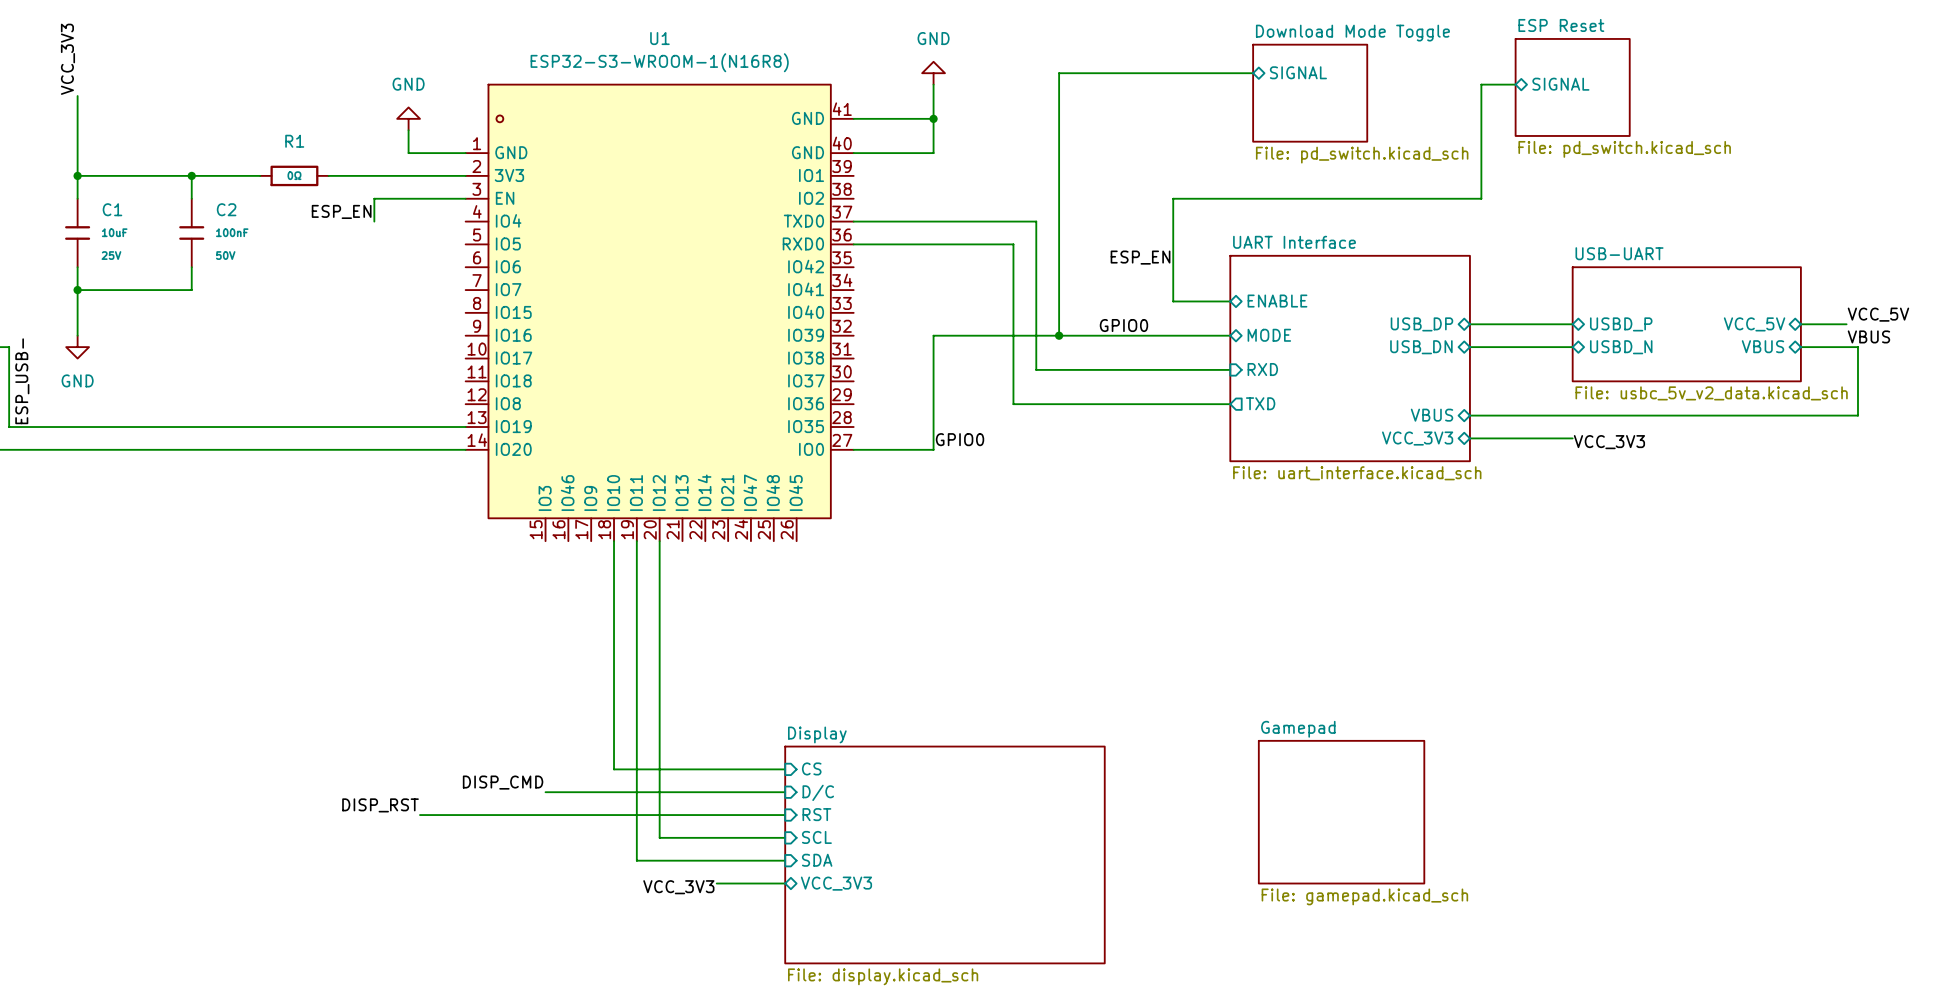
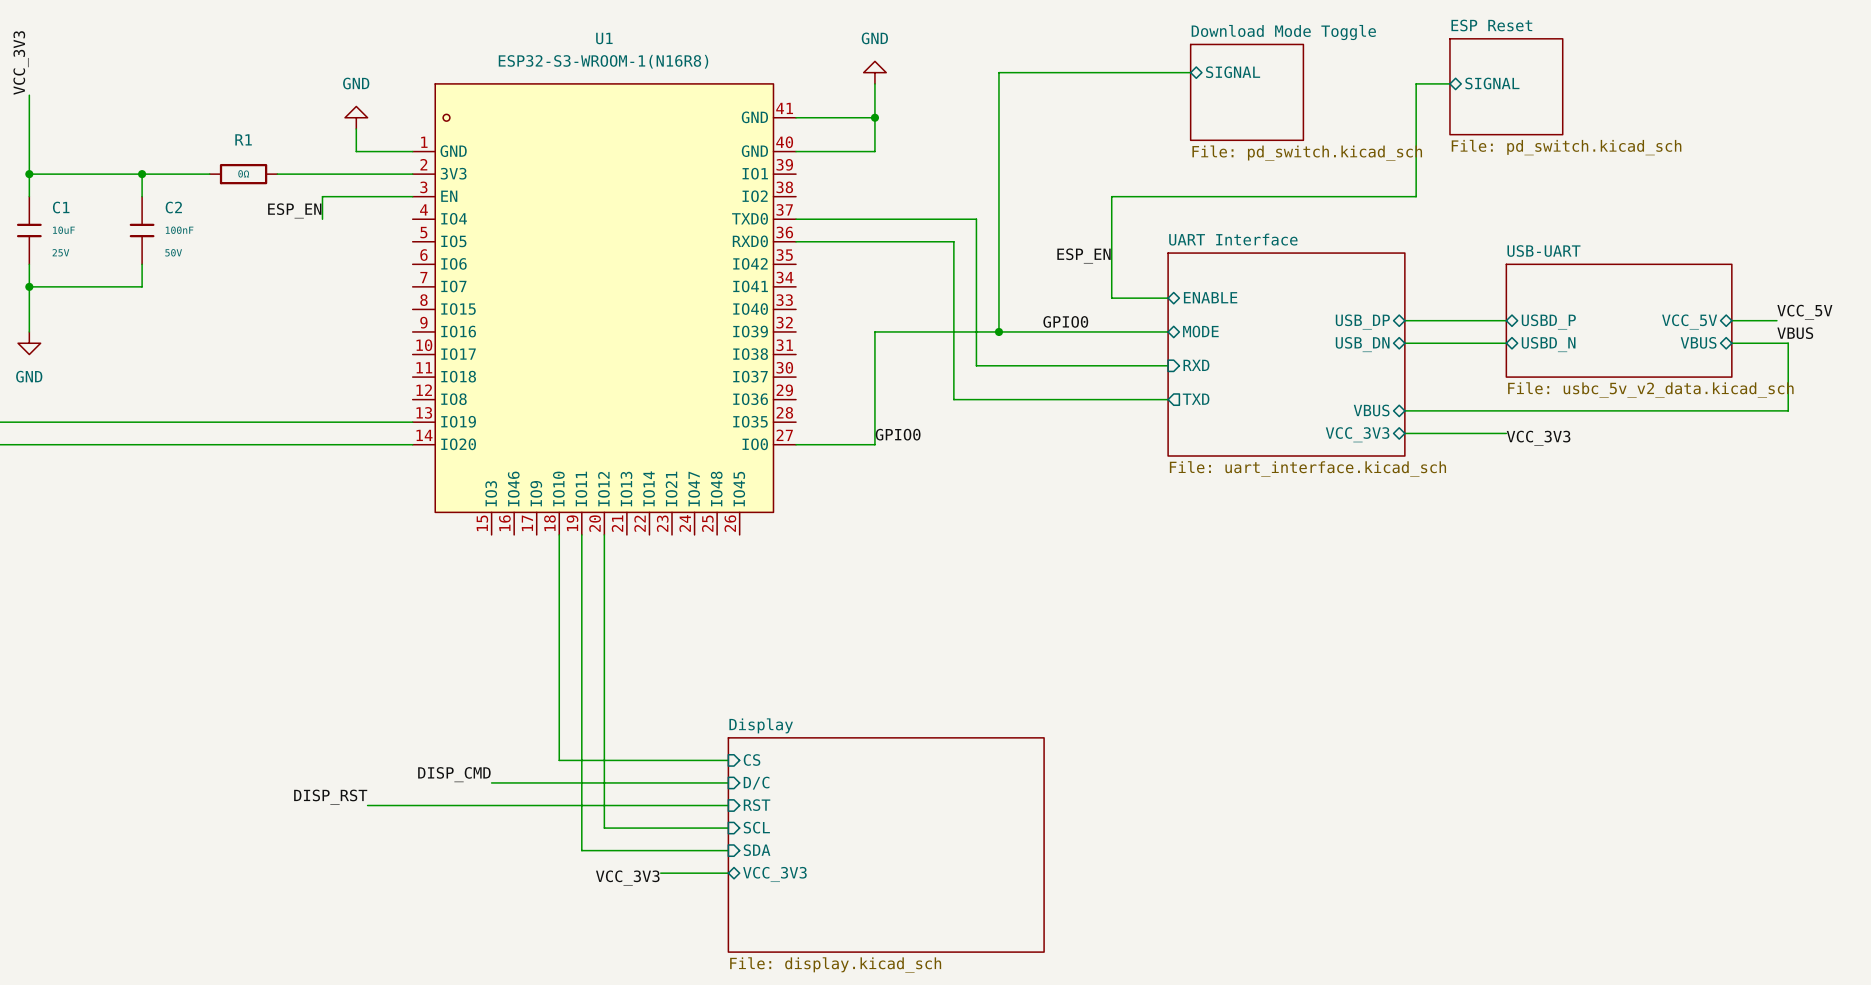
sheet Gamepad: File: gamepad.kicad_sch (1341, 812) -> none

